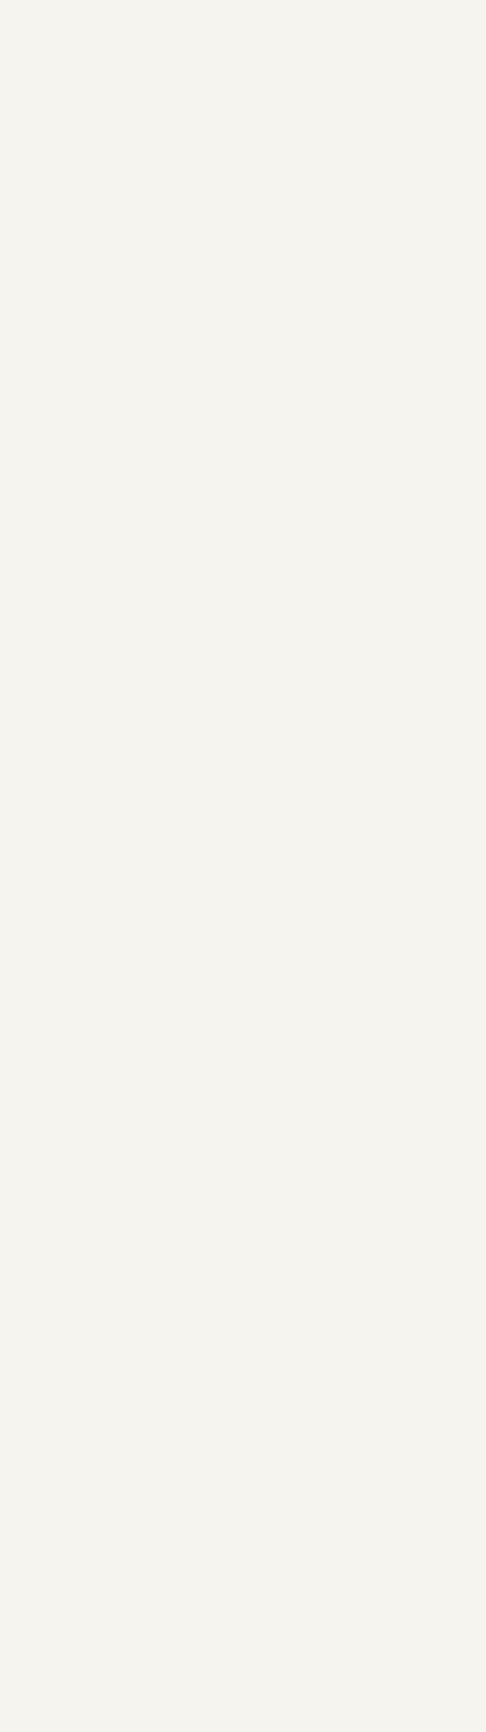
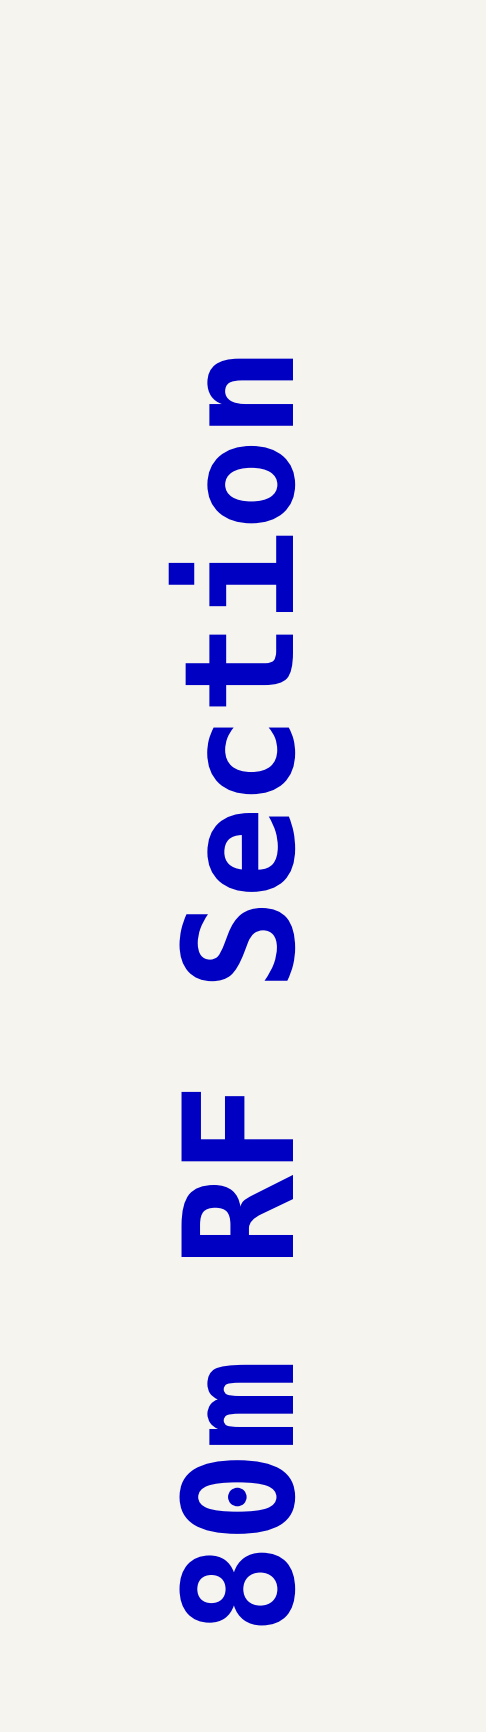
text: none -> 80m RF Section (231, 992)

